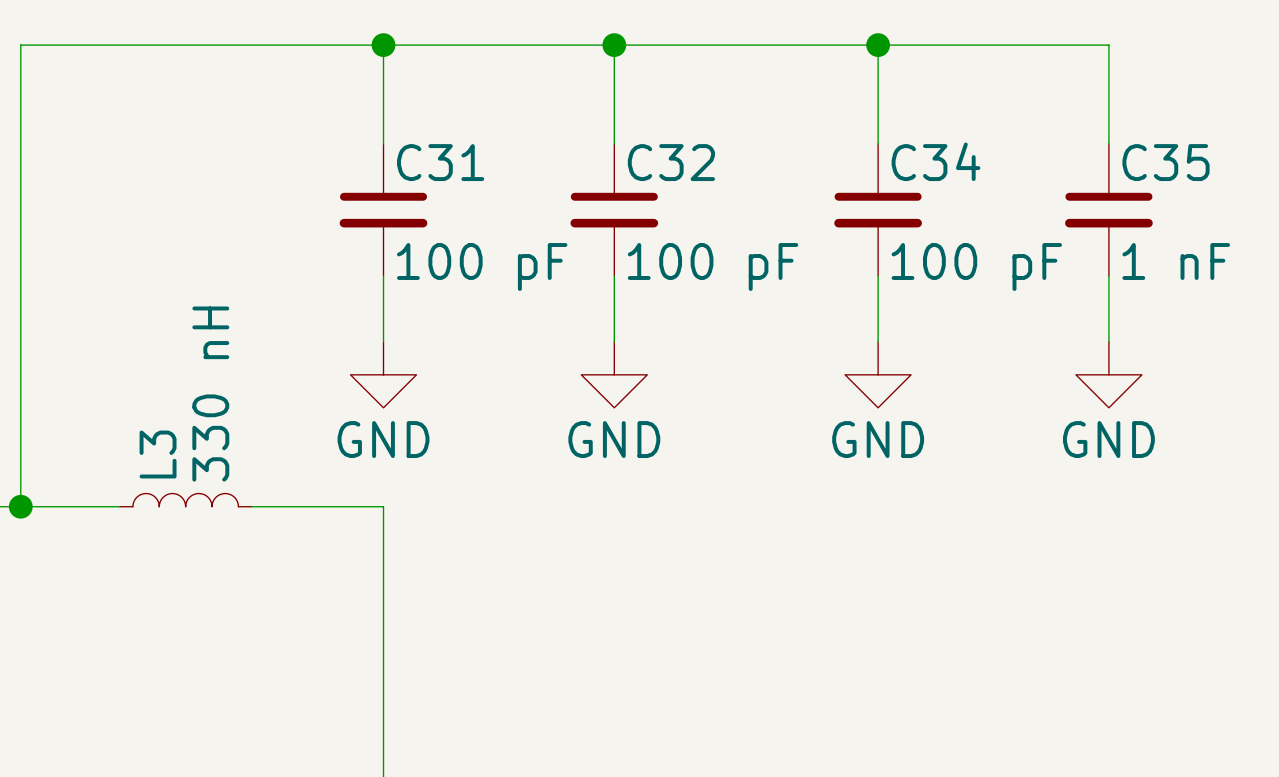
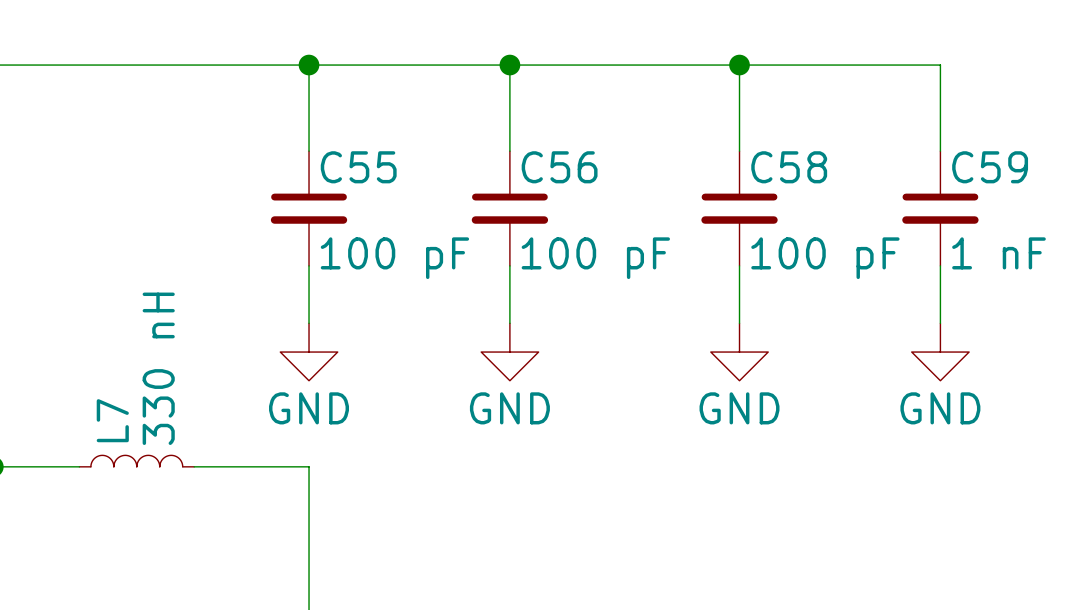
C34 name: C34 (935, 161) -> C58 (789, 167)
C31 name: C31 (440, 162) -> C55 (358, 167)
C32 name: C32 (671, 162) -> C56 (559, 167)
C35 name: C35 (1166, 162) -> C59 (990, 167)
L3 name: L3 (158, 454) -> L7 (112, 420)

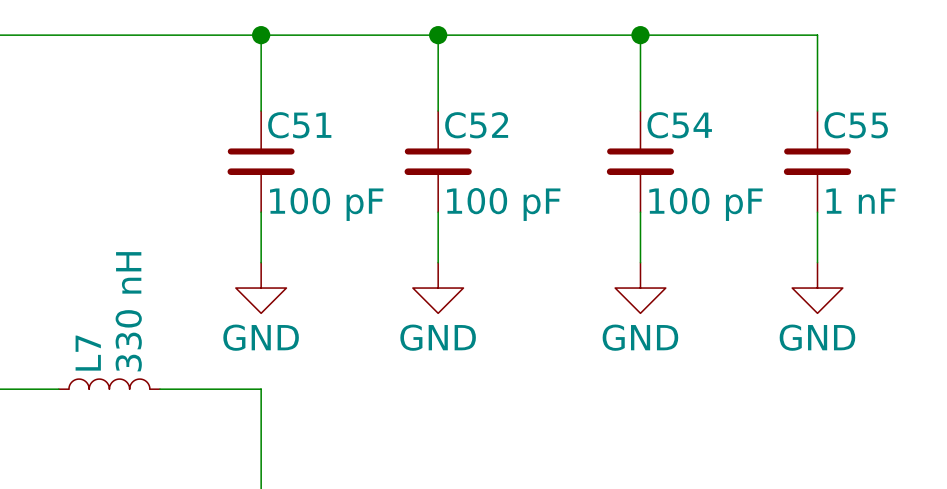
C55 name: C55 (358, 167) -> C51 (299, 125)
C56 name: C56 (559, 167) -> C52 (476, 125)
C58 name: C58 (789, 167) -> C54 (679, 125)
C59 name: C59 (990, 167) -> C55 (856, 125)

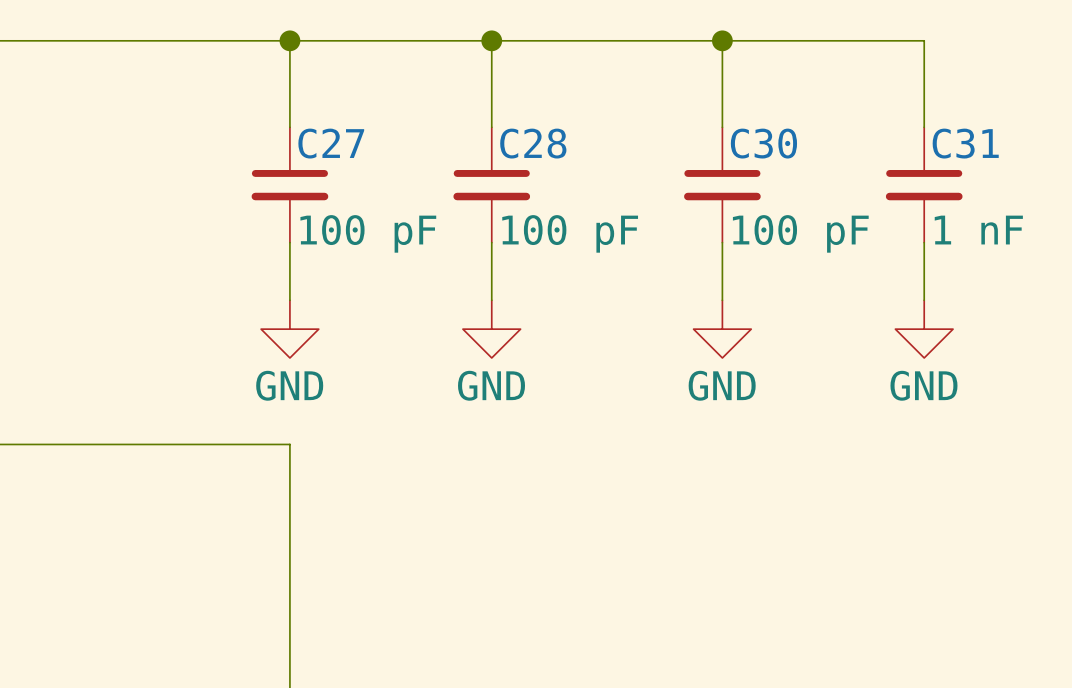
C51 name: C51 (299, 125) -> C27 (331, 143)
C52 name: C52 (476, 125) -> C28 (533, 143)
C54 name: C54 (679, 125) -> C30 (763, 143)
C55 name: C55 (856, 125) -> C31 (965, 143)
L7: 330 nH (109, 384) -> none
wire: none -> (59, 444) (174, 444)

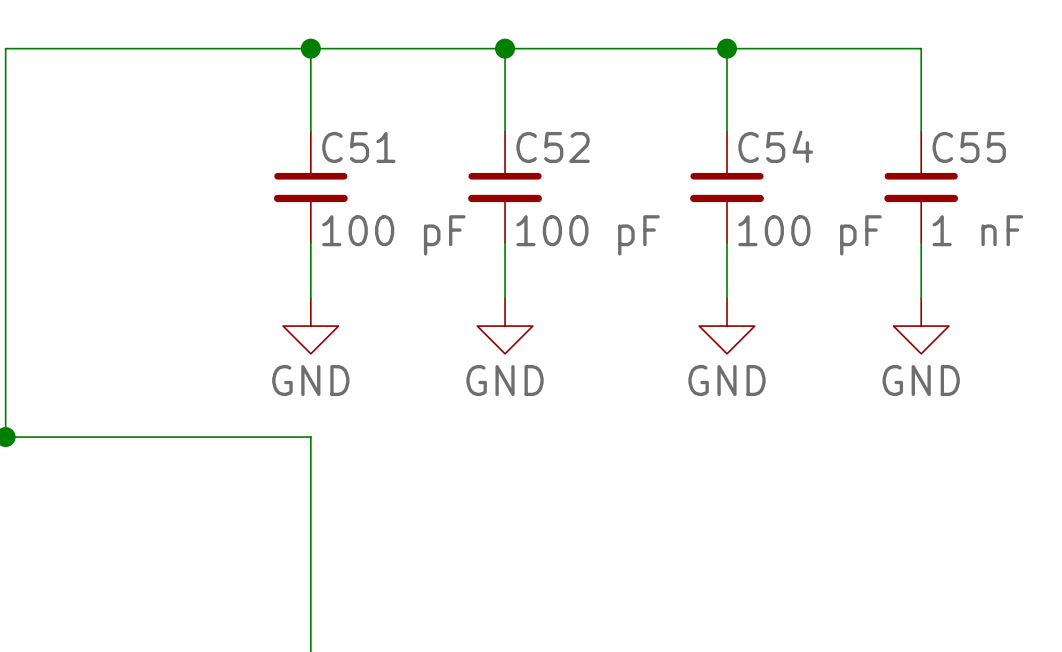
C27 name: C27 (331, 143) -> C51 (358, 147)
C28 name: C28 (533, 143) -> C52 (553, 147)
C30 name: C30 (763, 143) -> C54 (775, 146)
C31 name: C31 (965, 143) -> C55 (969, 147)

